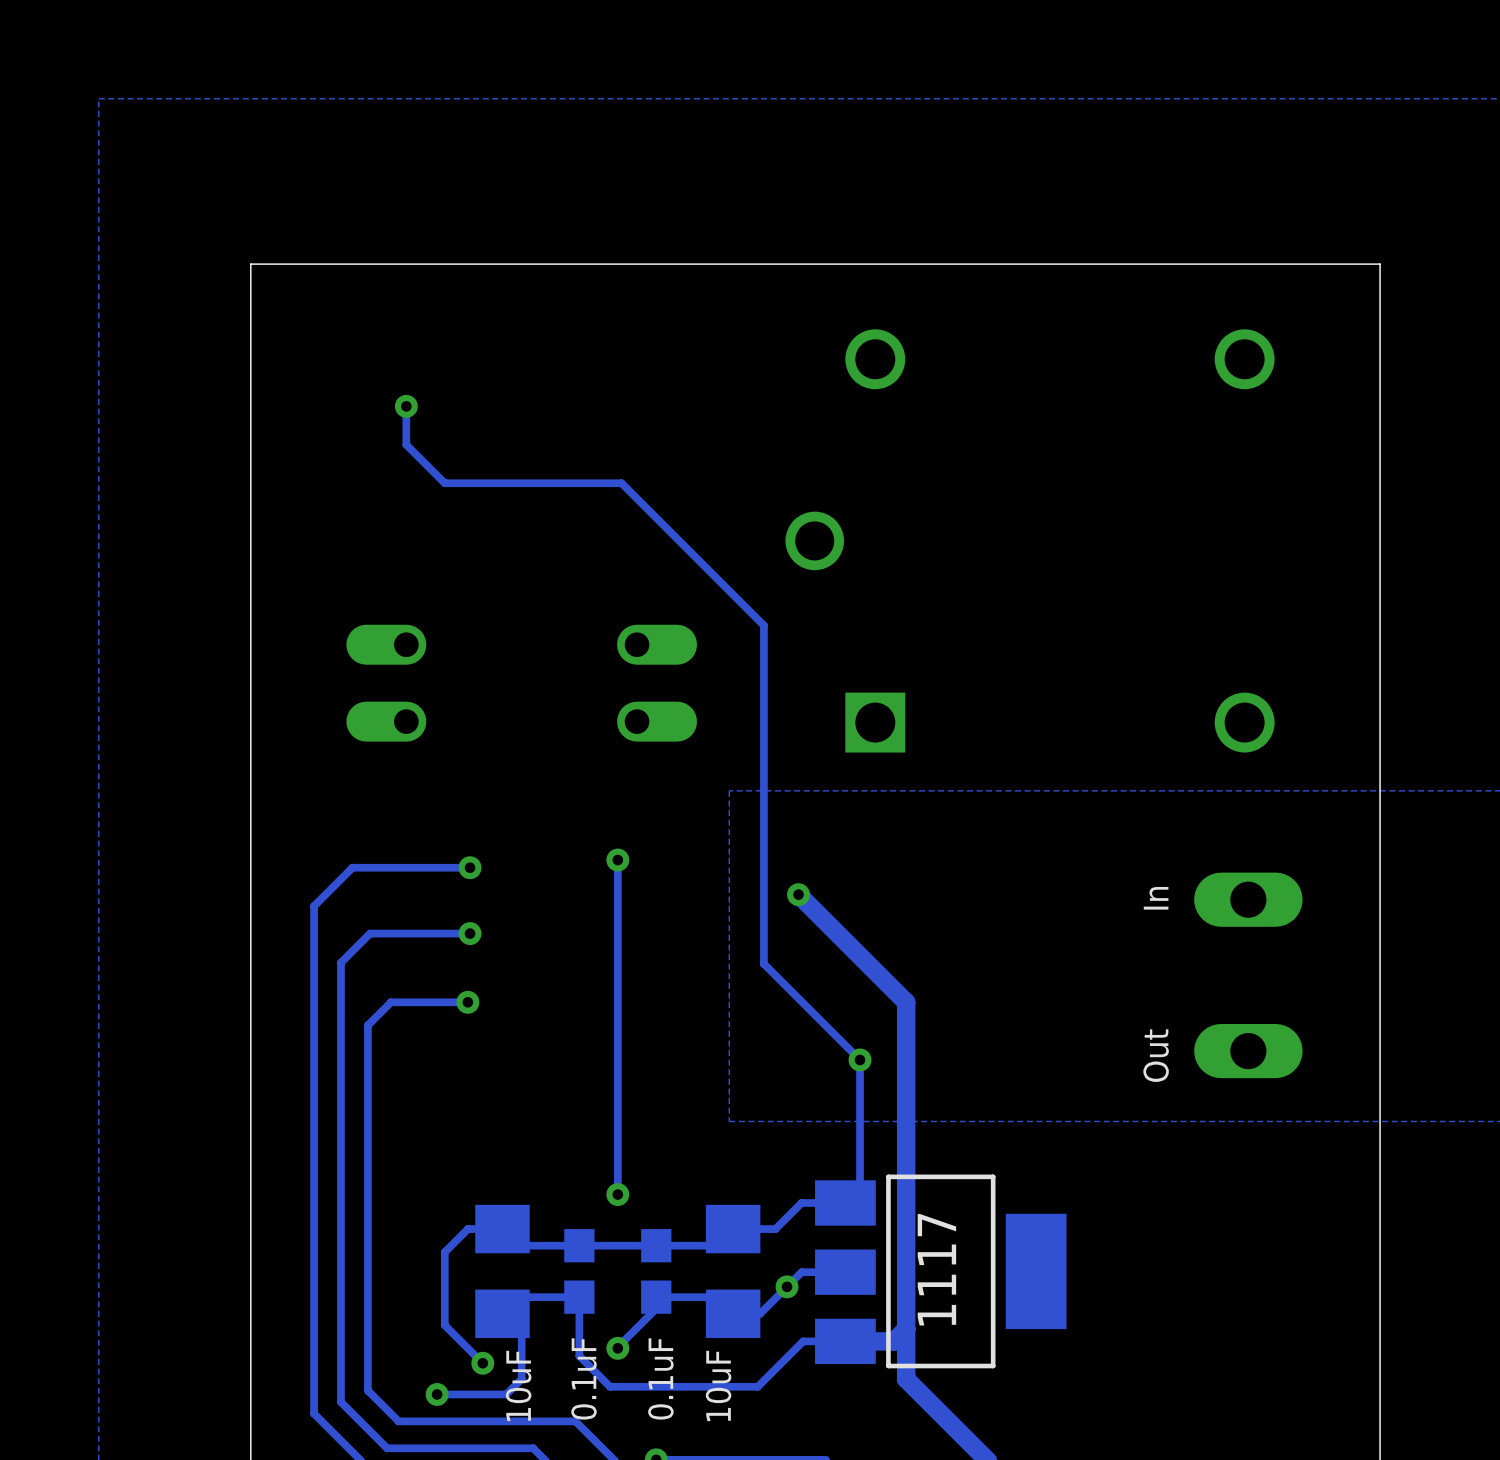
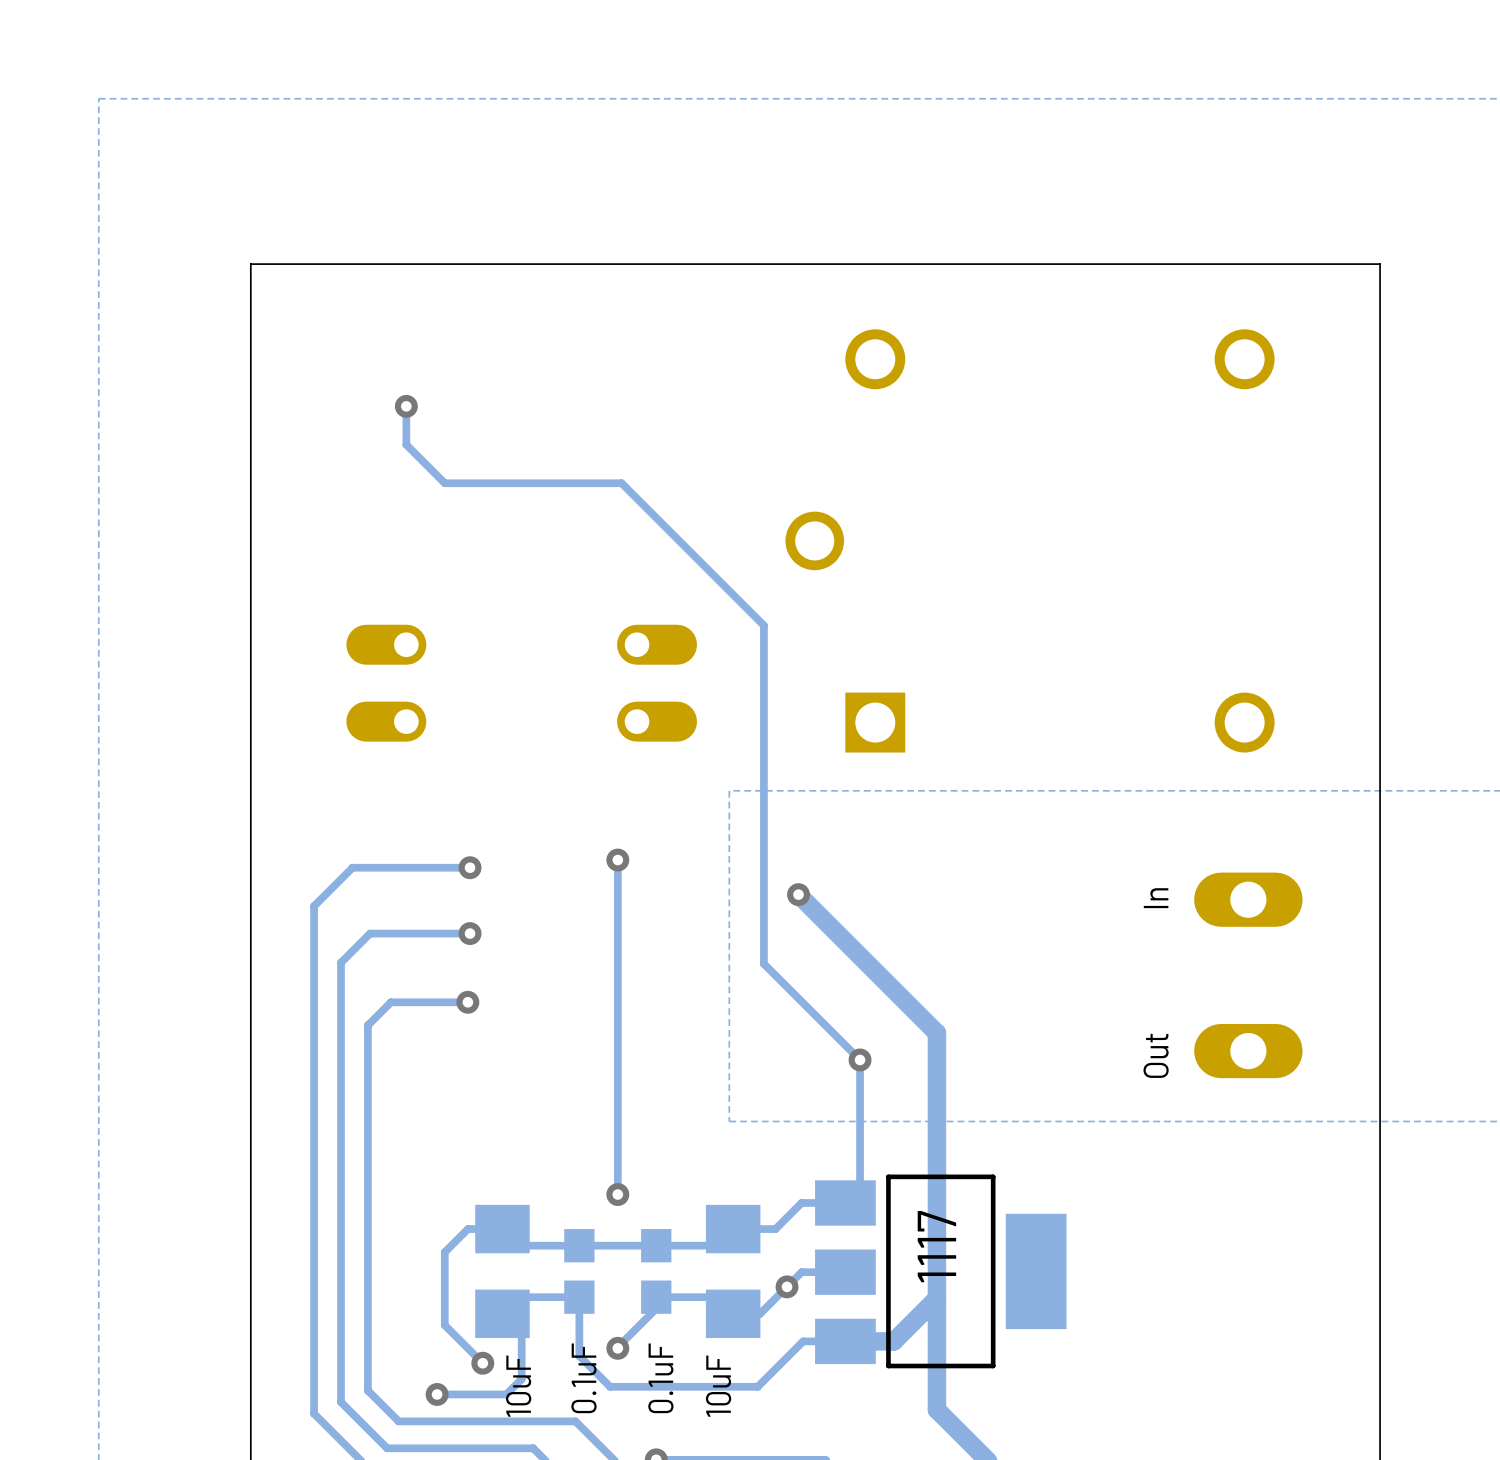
track: (906, 1002) (906, 1379) (936, 1409) -> (906, 1002) (936, 1033) (936, 1409)
track: none -> (936, 1298) (906, 1329)

